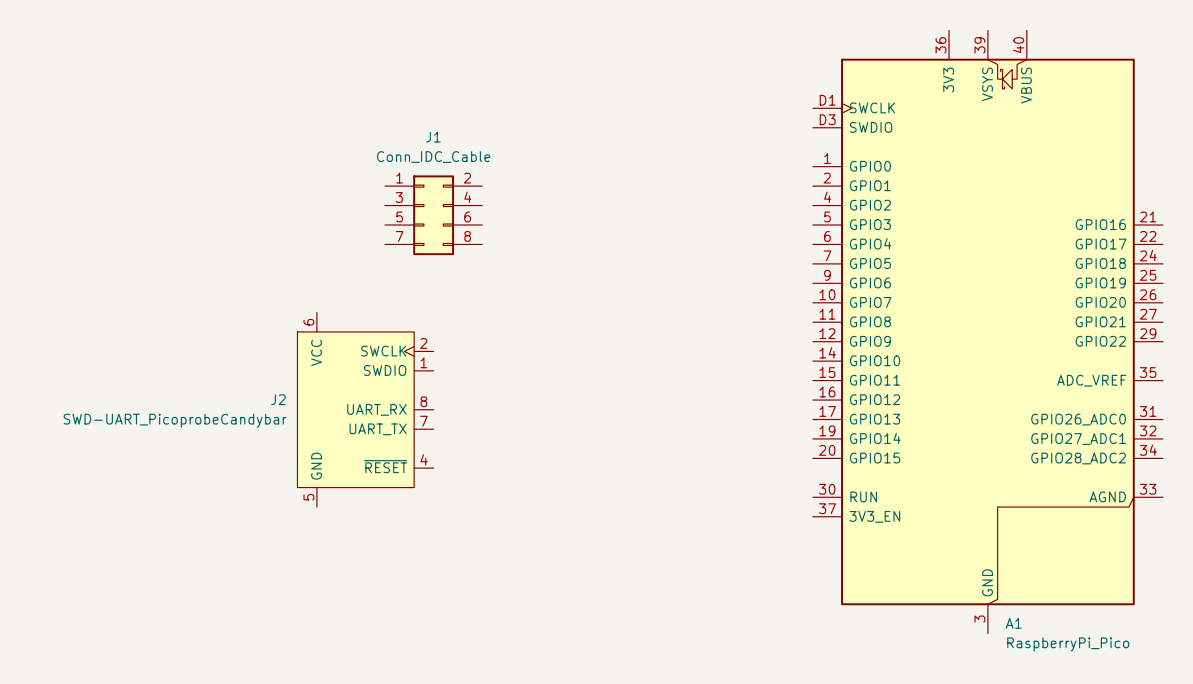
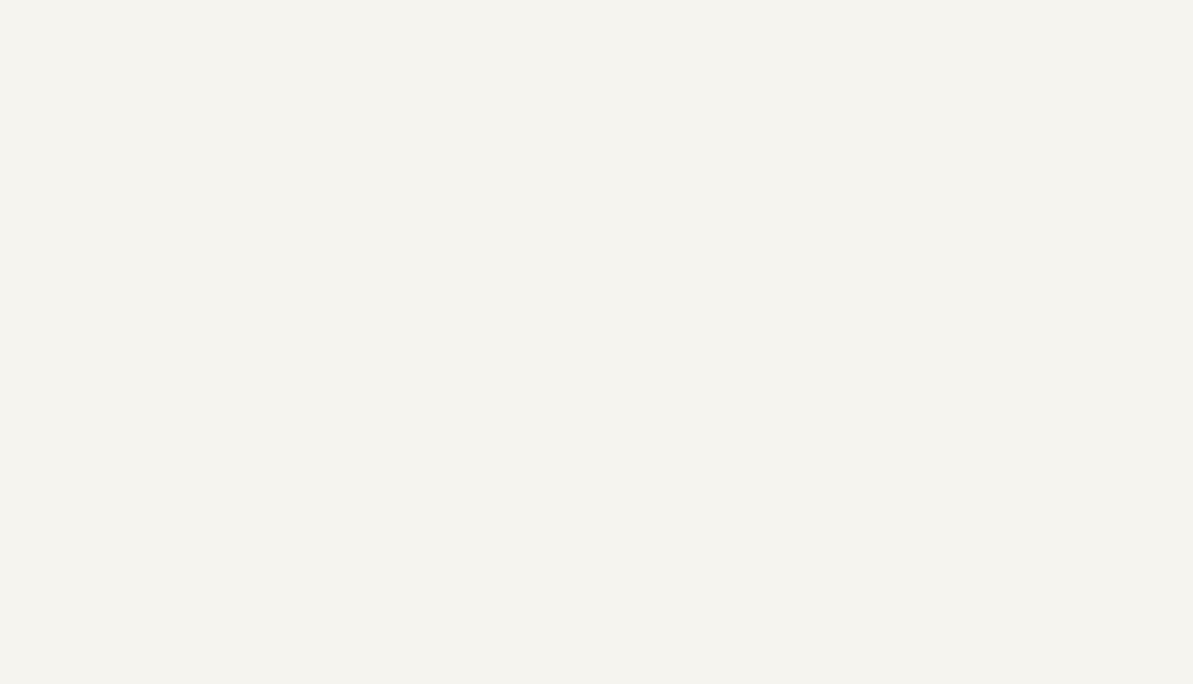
J1: Conn_IDC_Cable (433, 215) -> none
A1: RaspberryPi_Pico (987, 331) -> none
J2: SWD-UART_PicoprobeCandybar (365, 409) -> none

